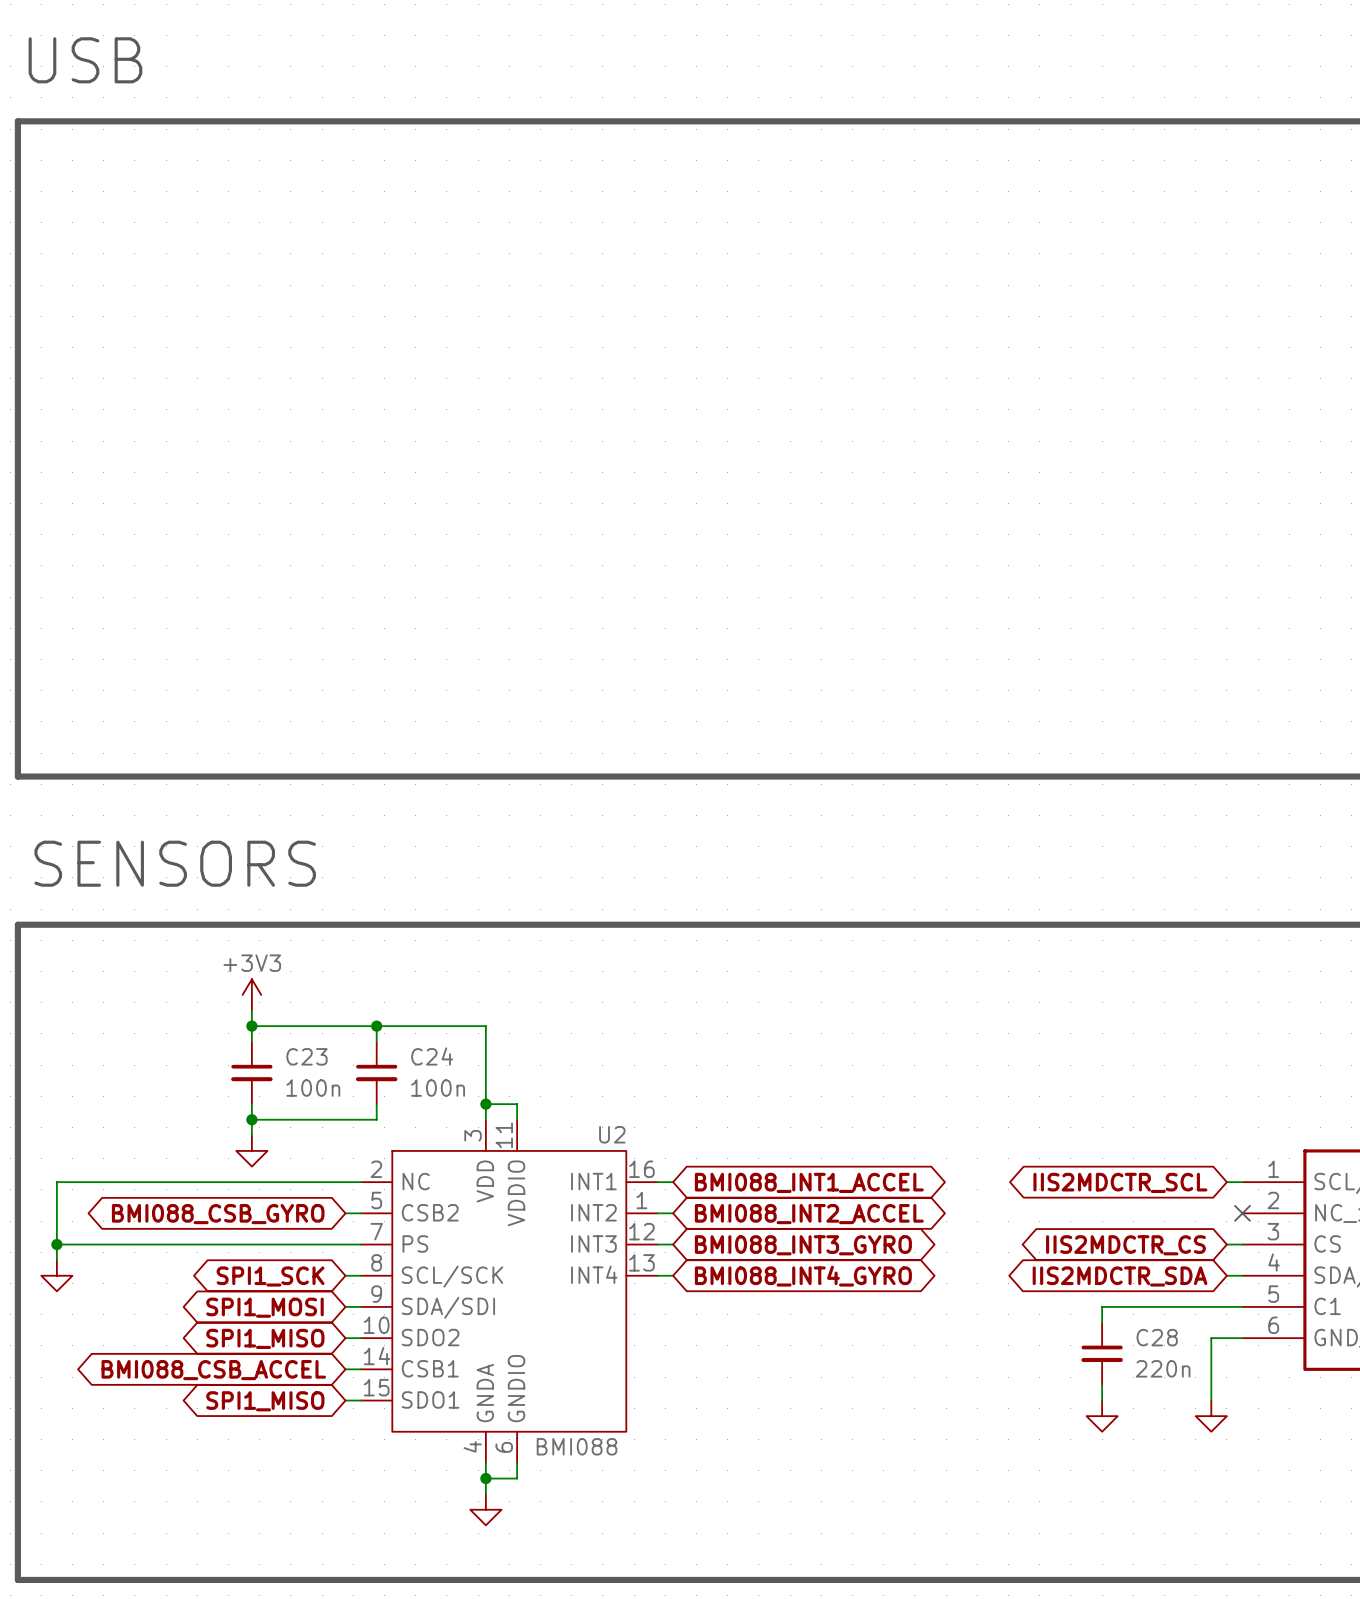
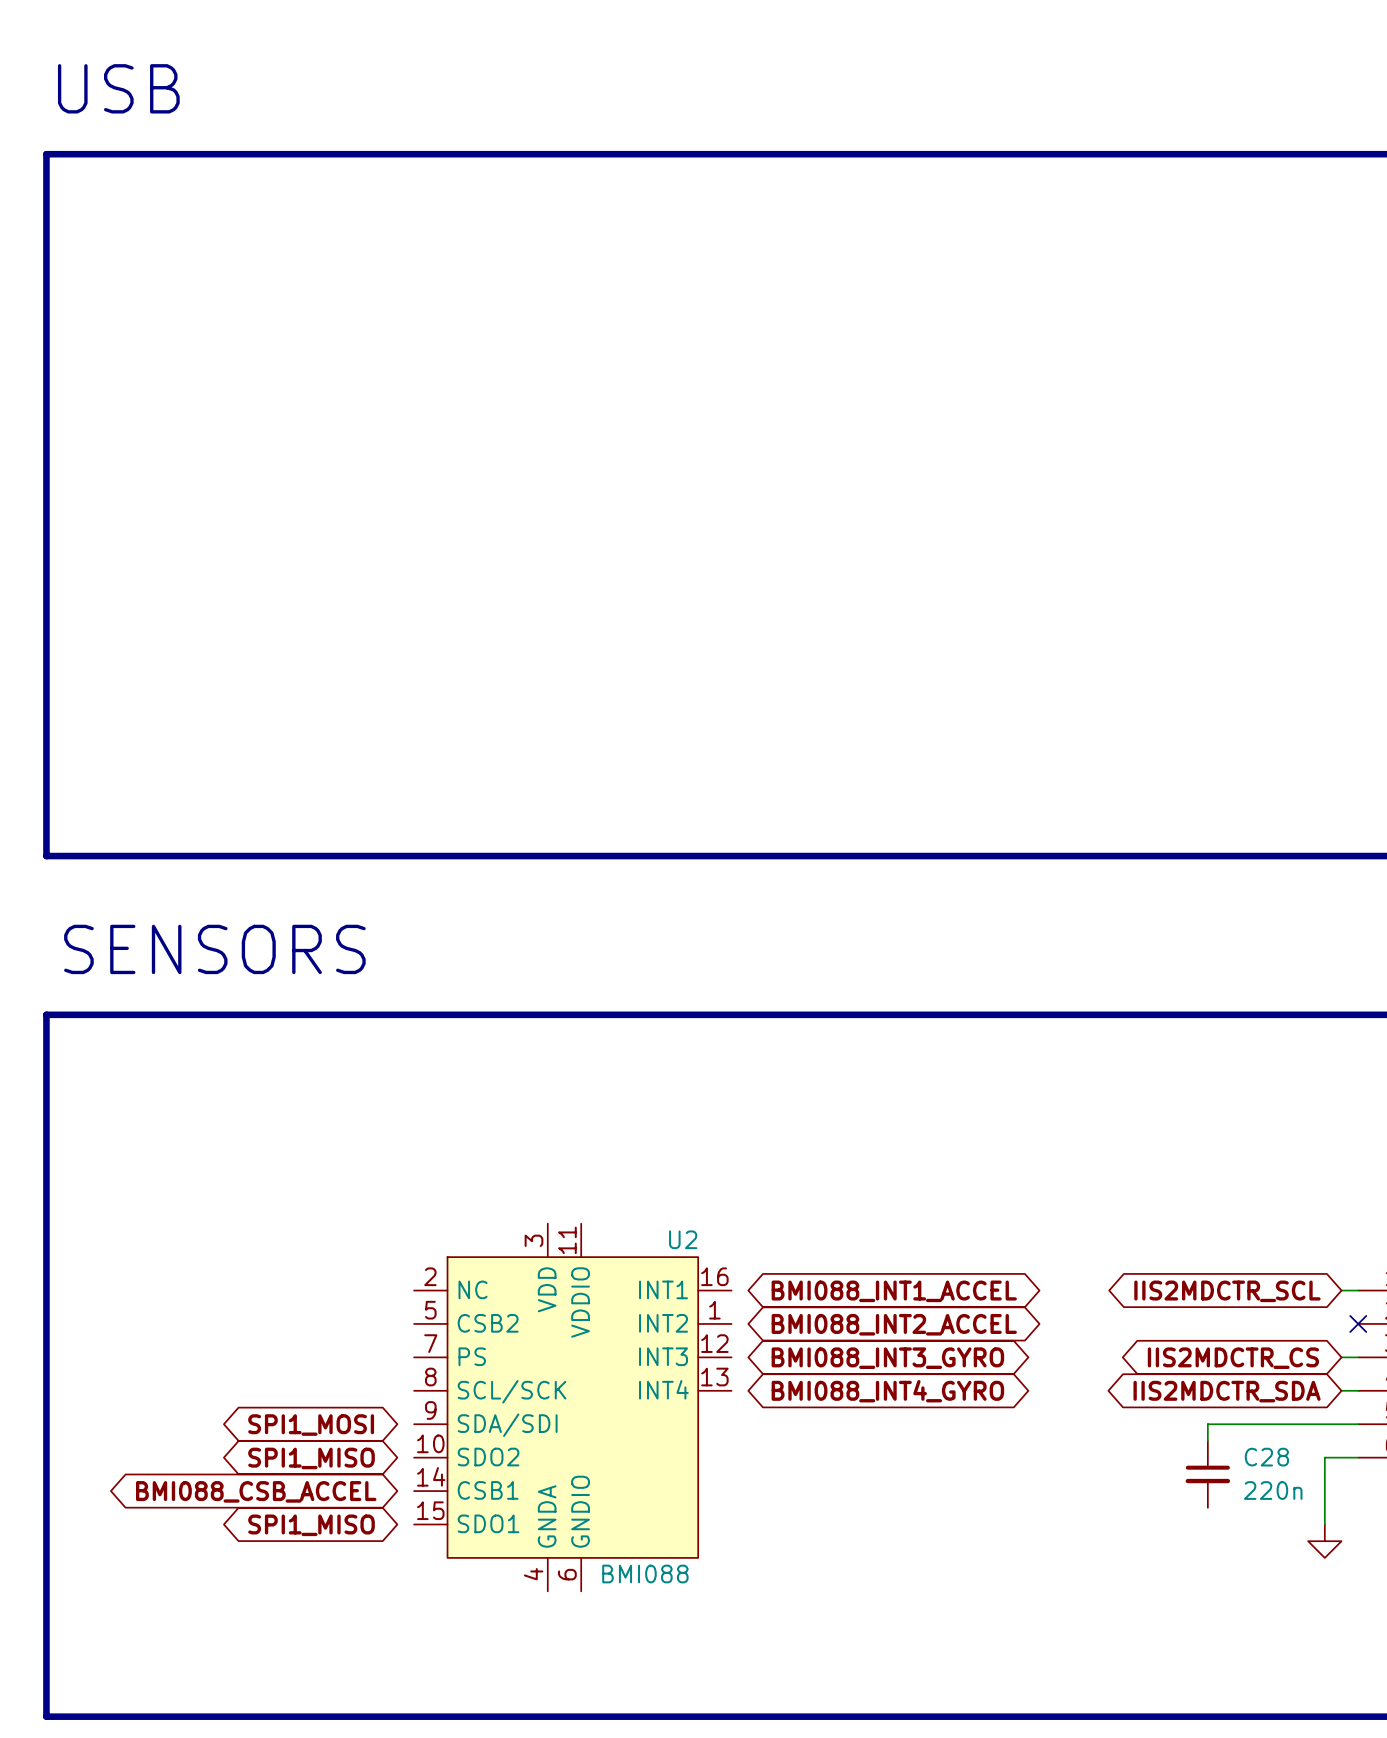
power symbol: +3V3 (251, 994) -> none
wire: (251, 1010) (251, 1041) -> none
wire: (251, 1026) (485, 1026) (485, 1119) -> none
junction: (251, 1026) -> none
wire: (376, 1026) (376, 1041) -> none
junction: (376, 1026) -> none
C23: 100n (251, 1072) -> none
C24: 100n (376, 1072) -> none
wire: (251, 1104) (251, 1135) -> none
wire: (376, 1104) (376, 1119) (251, 1119) -> none
wire: (485, 1104) (517, 1104) (517, 1119) -> none
junction: (485, 1104) -> none
junction: (251, 1119) -> none
power symbol: (251, 1150) -> none
wire: (361, 1182) (56, 1182) (56, 1260) -> none
wire: (657, 1182) (673, 1182) -> none
wire: (345, 1213) (361, 1213) -> none
wire: (657, 1213) (673, 1213) -> none
global label: BMI088_CSB_GYRO (218, 1214) -> none
wire: (56, 1244) (361, 1244) -> none
junction: (56, 1244) -> none
wire: (657, 1244) (673, 1244) -> none
power symbol: (56, 1275) -> none
wire: (345, 1275) (361, 1275) -> none
wire: (657, 1275) (673, 1275) -> none
global label: SPI1_SCK (270, 1276) -> none
wire: (345, 1306) (361, 1306) -> none
wire: (345, 1338) (361, 1338) -> none
wire: (345, 1369) (361, 1369) -> none
wire: (1102, 1384) (1102, 1400) -> none
wire: (345, 1400) (361, 1400) -> none
power symbol: (1102, 1416) -> none
wire: (485, 1462) (485, 1494) -> none
wire: (517, 1462) (517, 1478) (485, 1478) -> none
junction: (485, 1478) -> none
power symbol: (485, 1509) -> none

